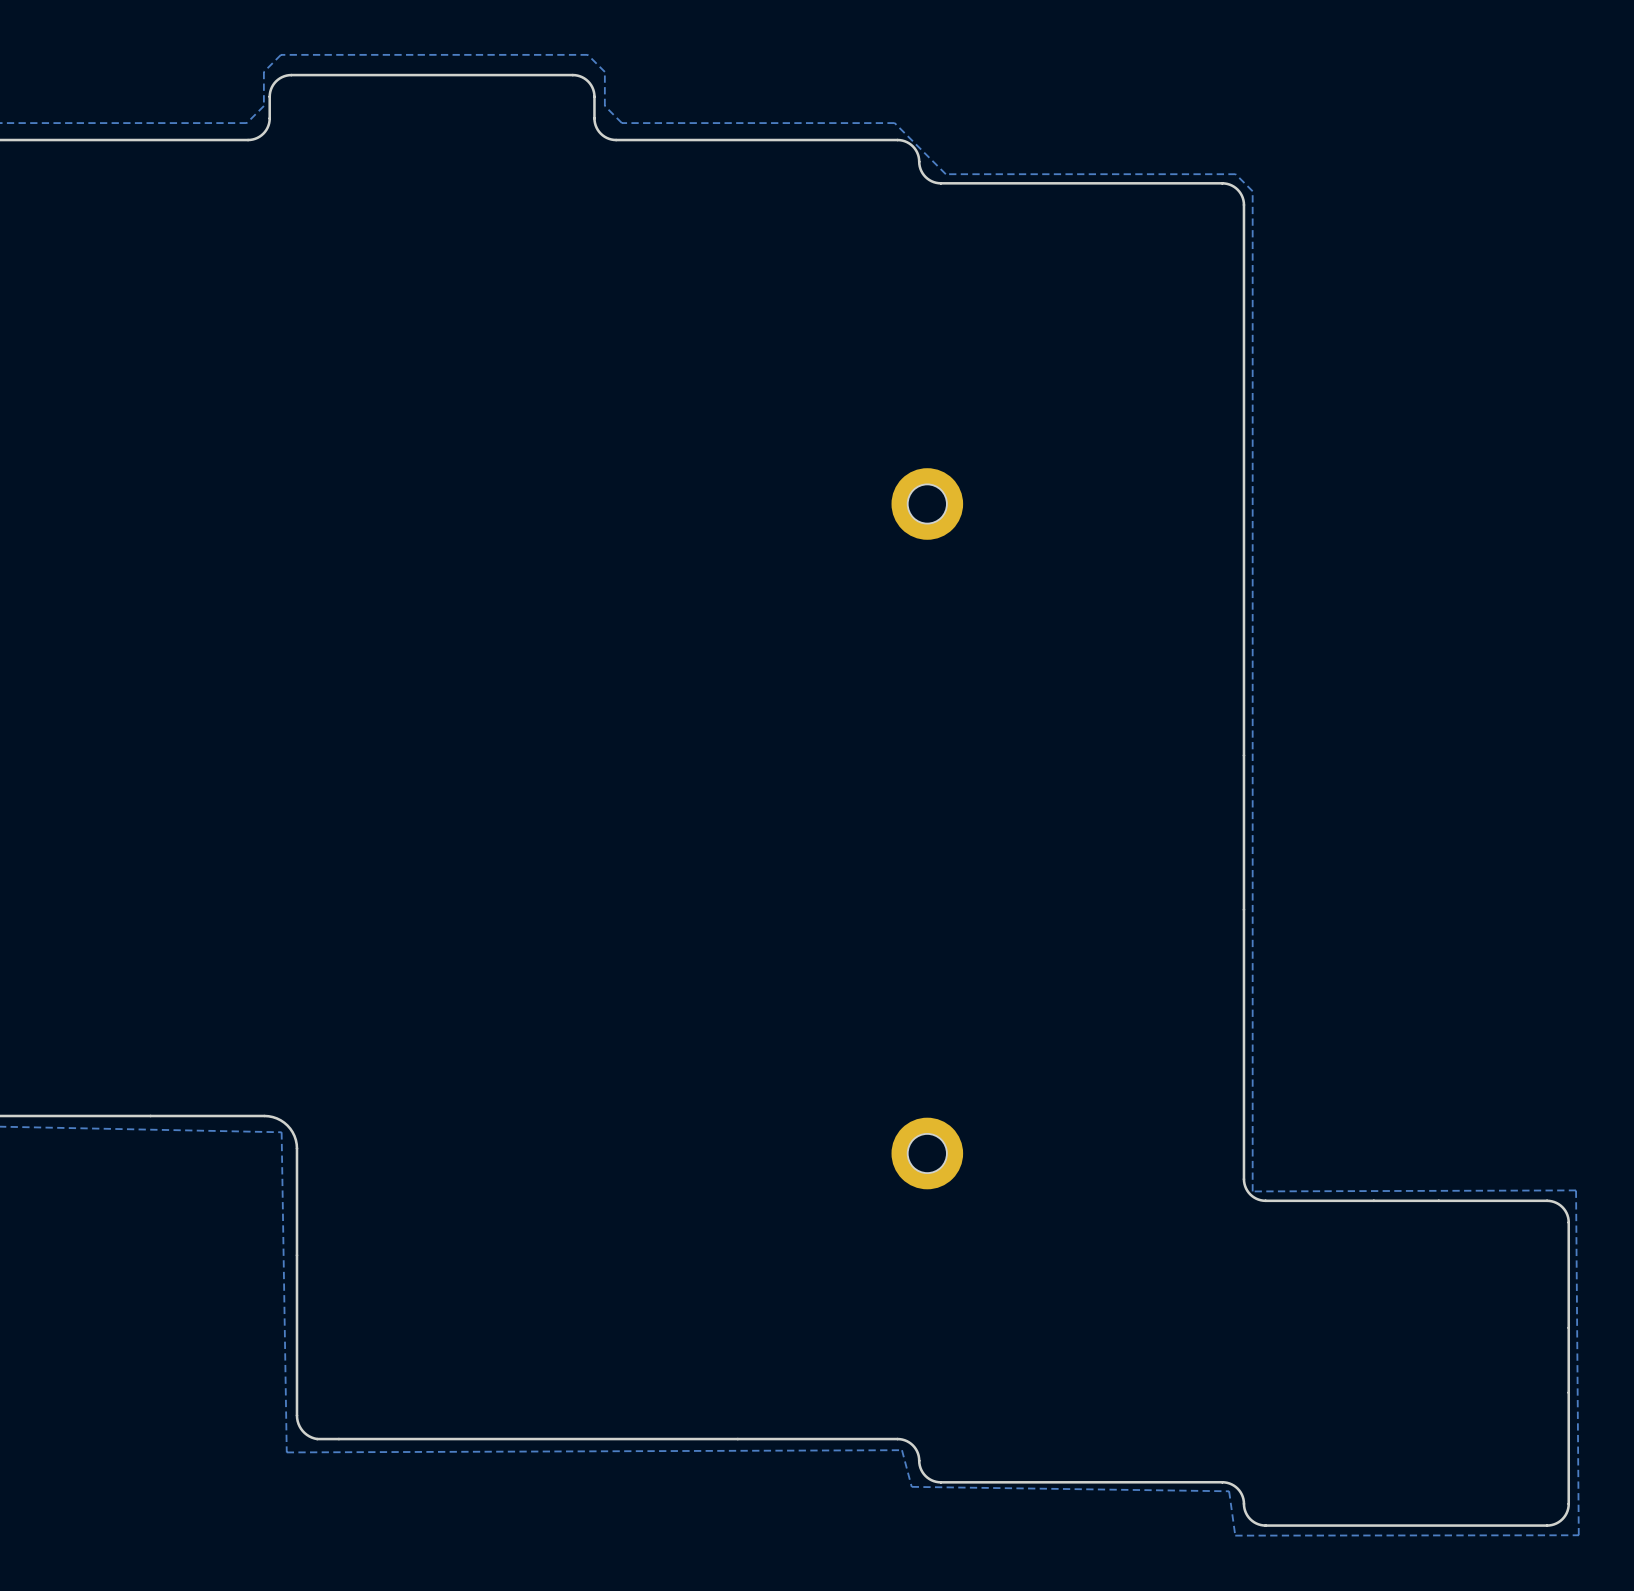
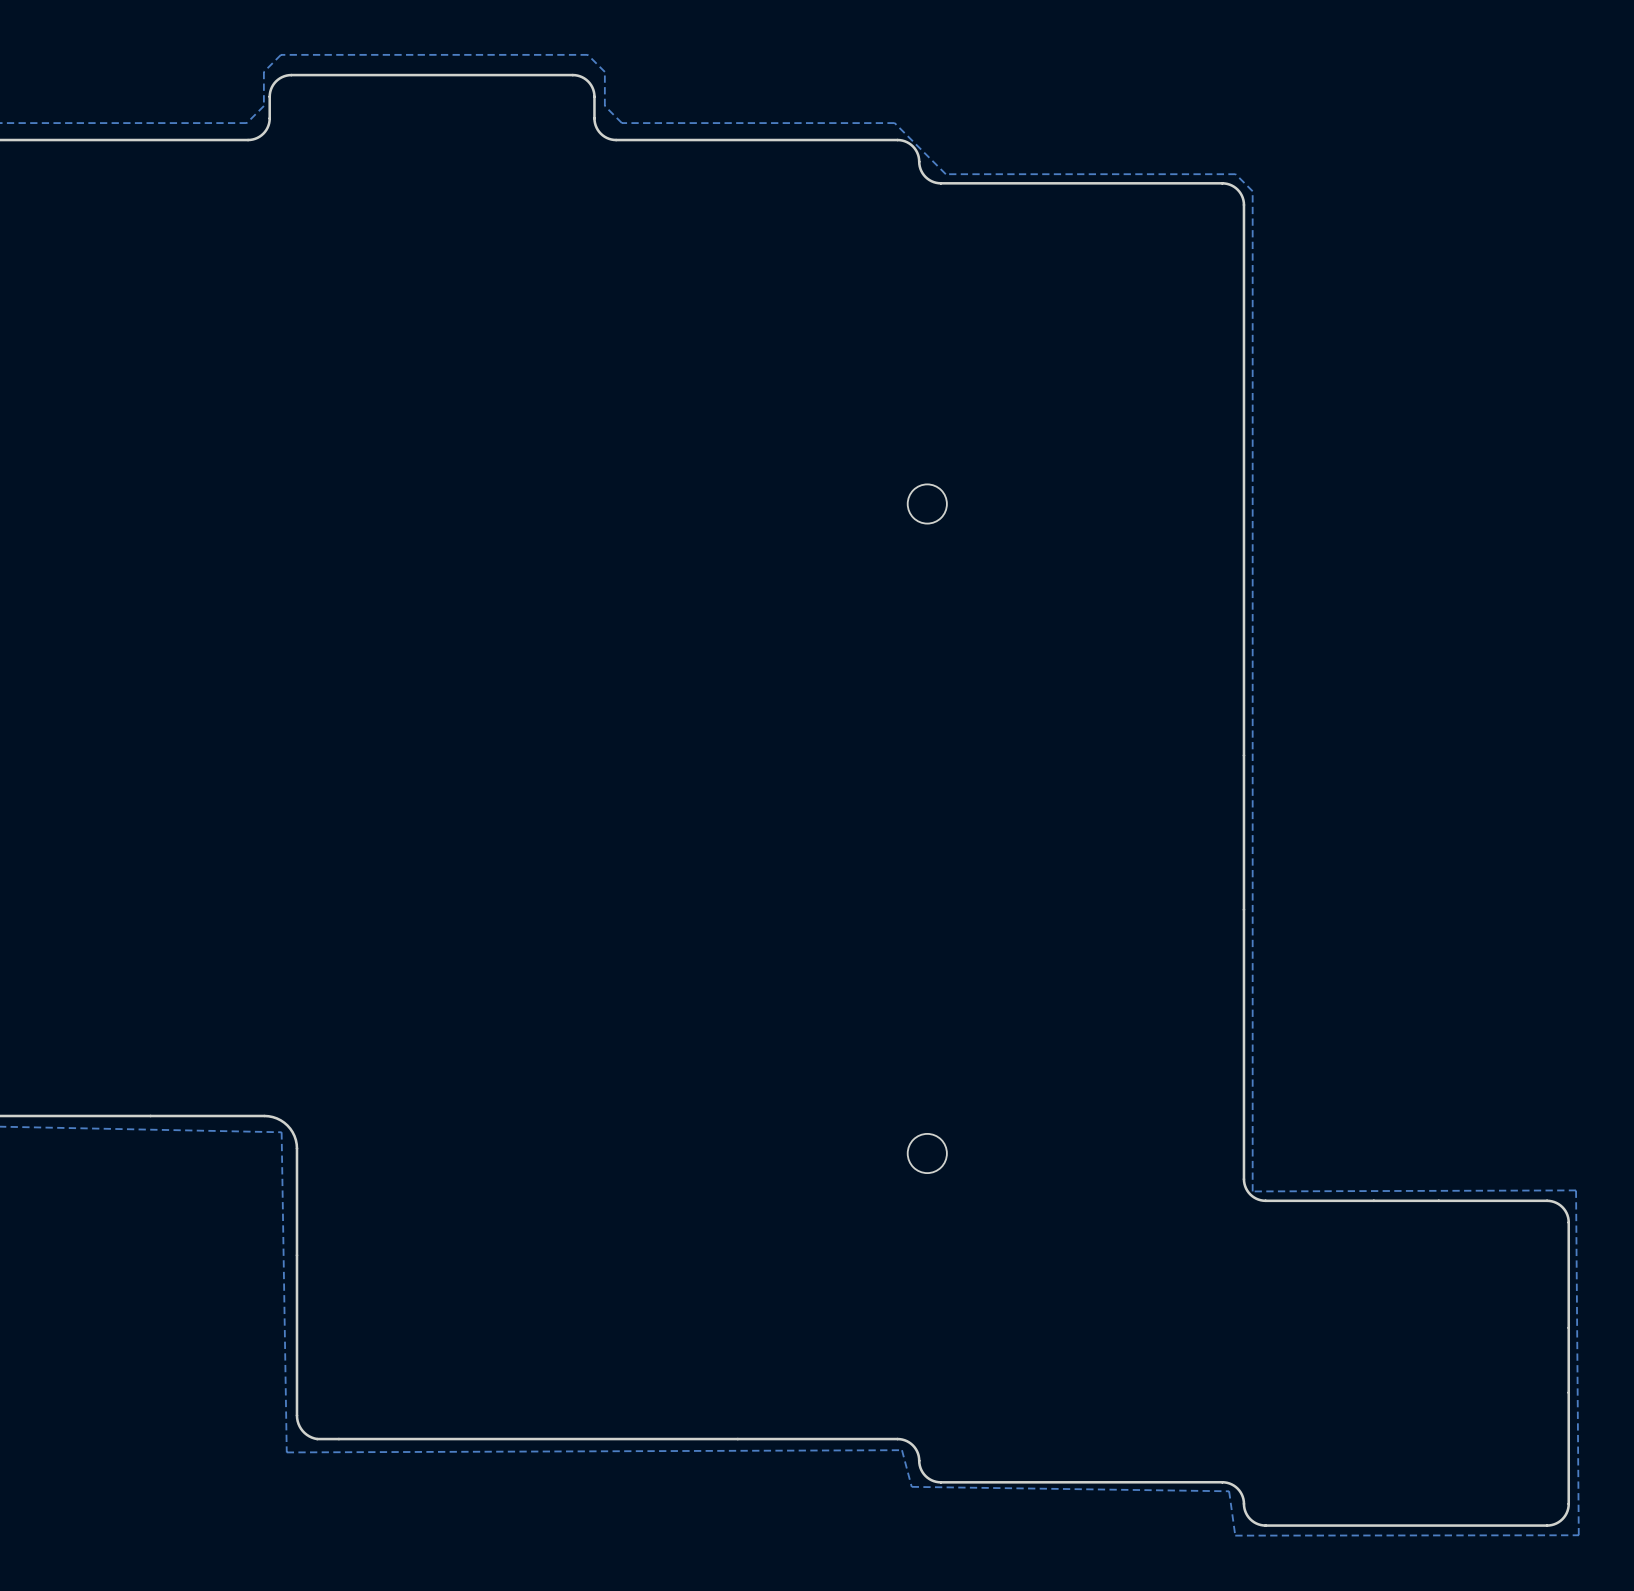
drawing: none -> [906, 483, 948, 525]
part: (927, 503) -> none
drawing: none -> [906, 1133, 948, 1174]
part: (927, 1153) -> none

